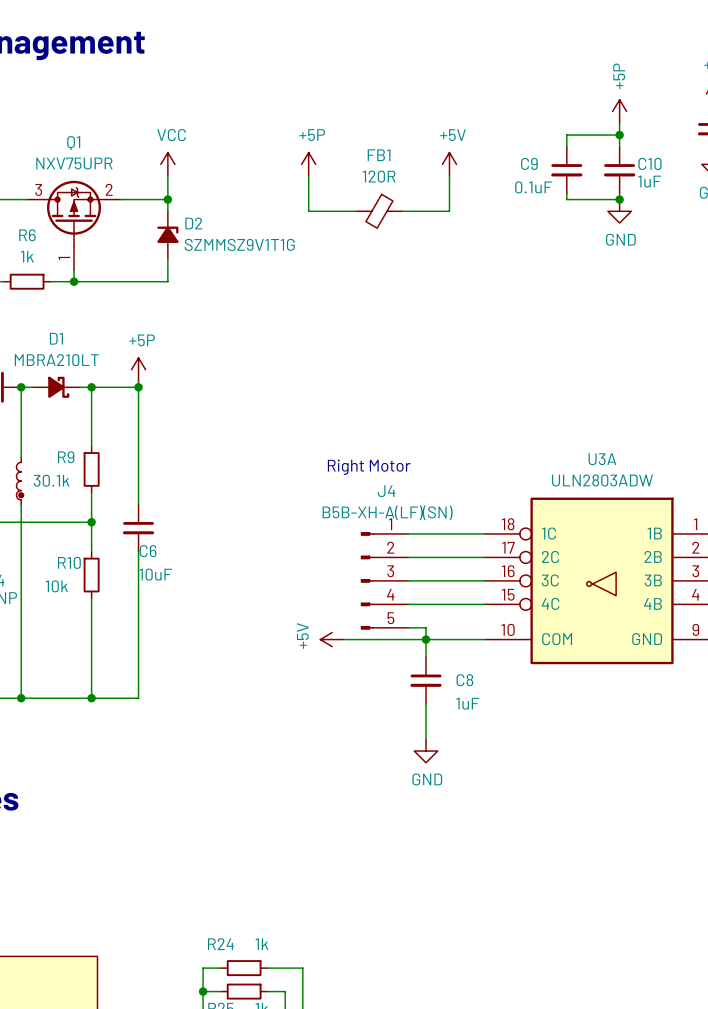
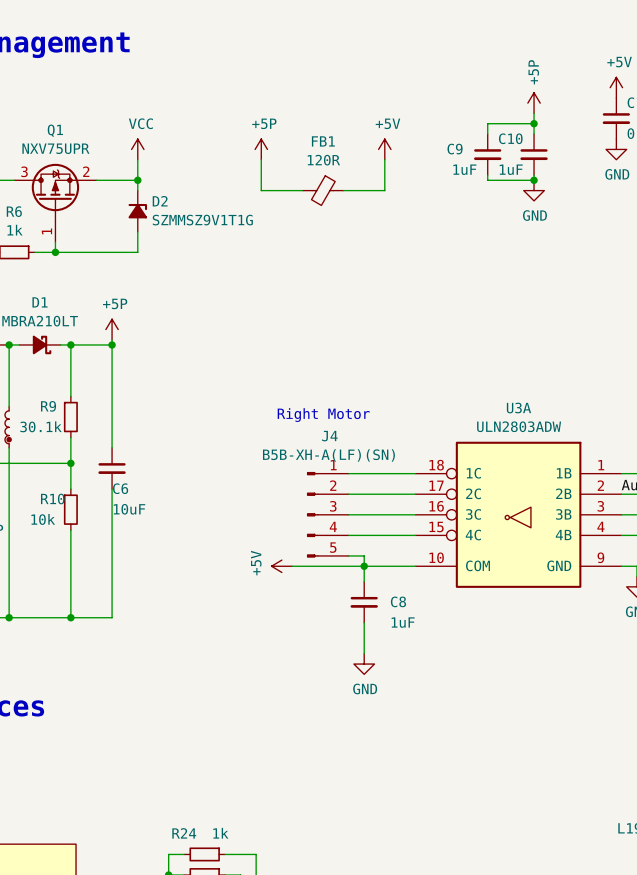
C10 name position: C10 (649, 163) -> C10 (510, 138)
C10 value position: 1uF (649, 181) -> 1uF (511, 169)
C9 value: 0.1uF (533, 187) -> 1uF (464, 169)

